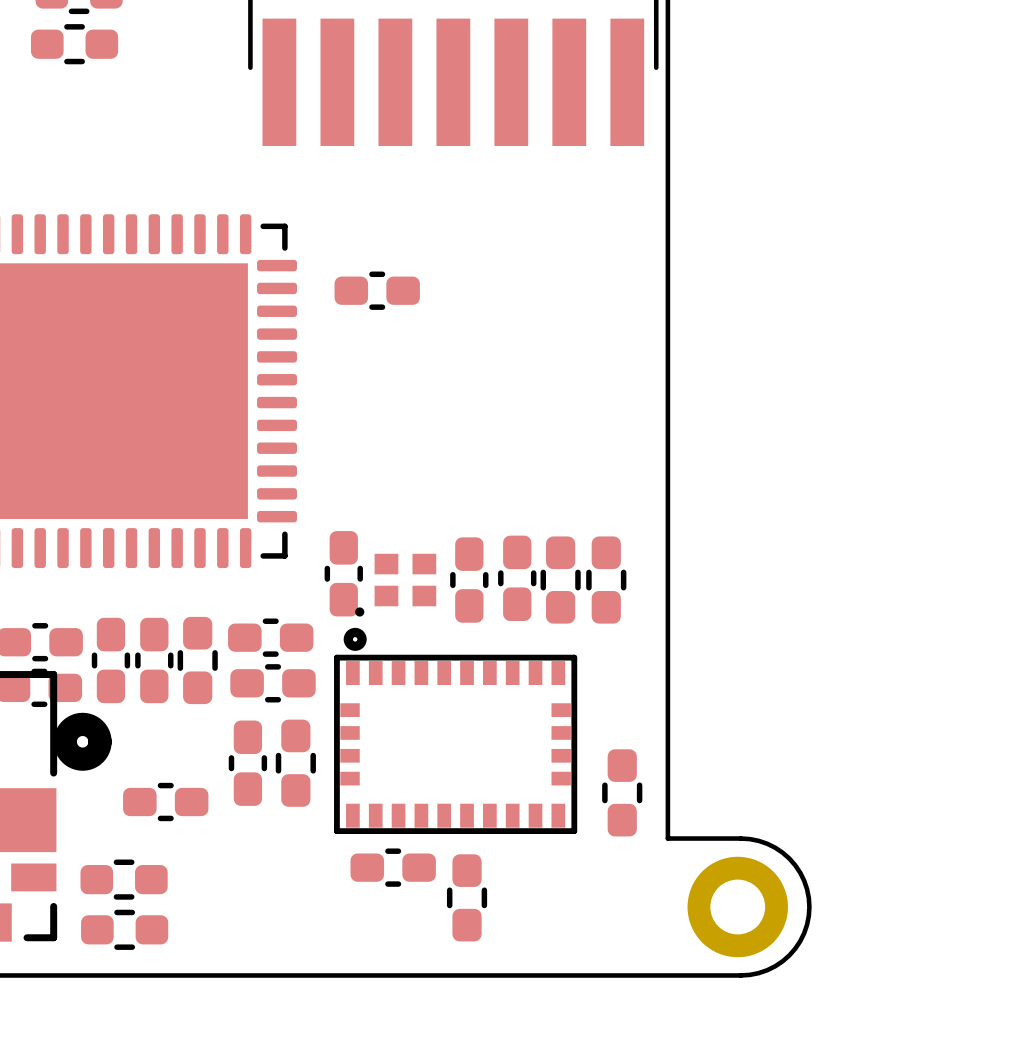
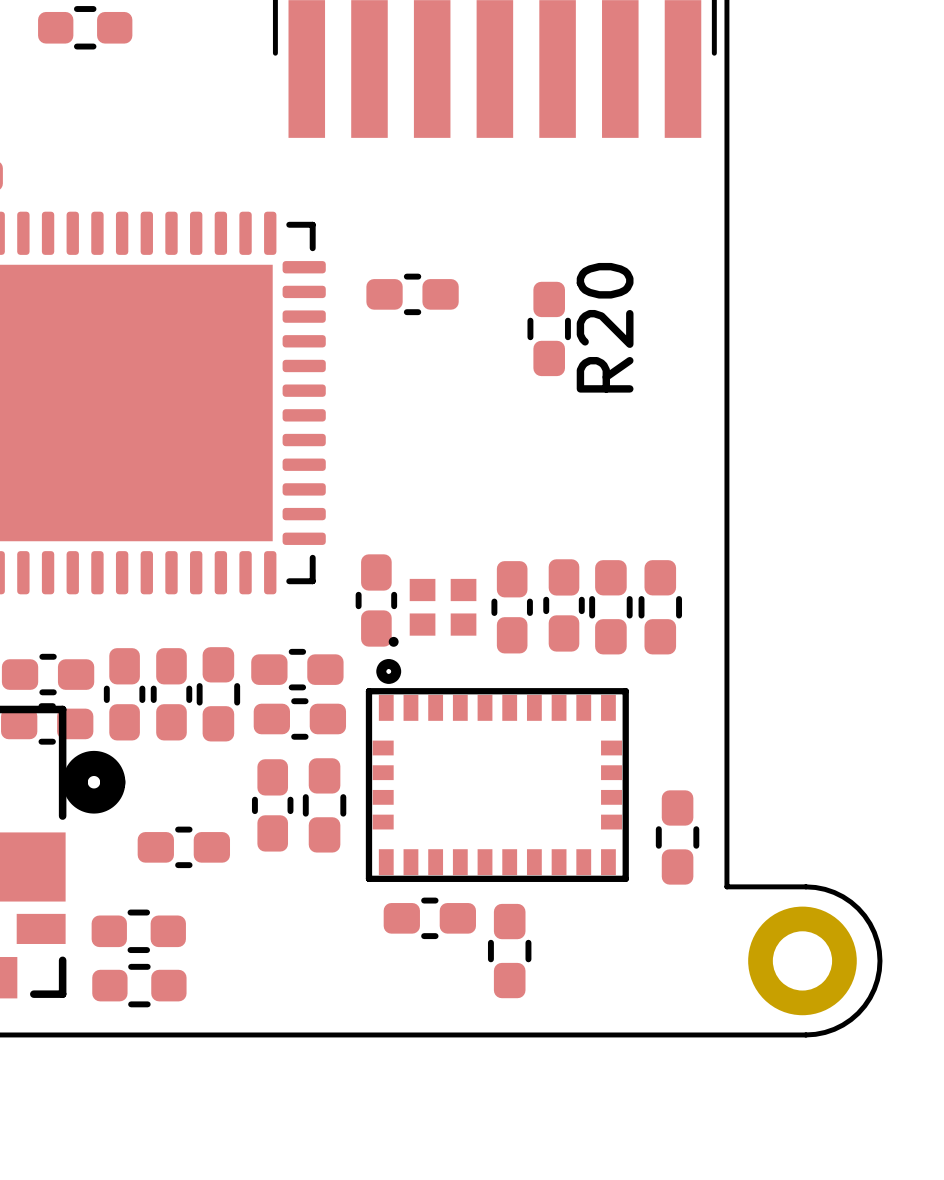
R20: none -> (549, 328)

